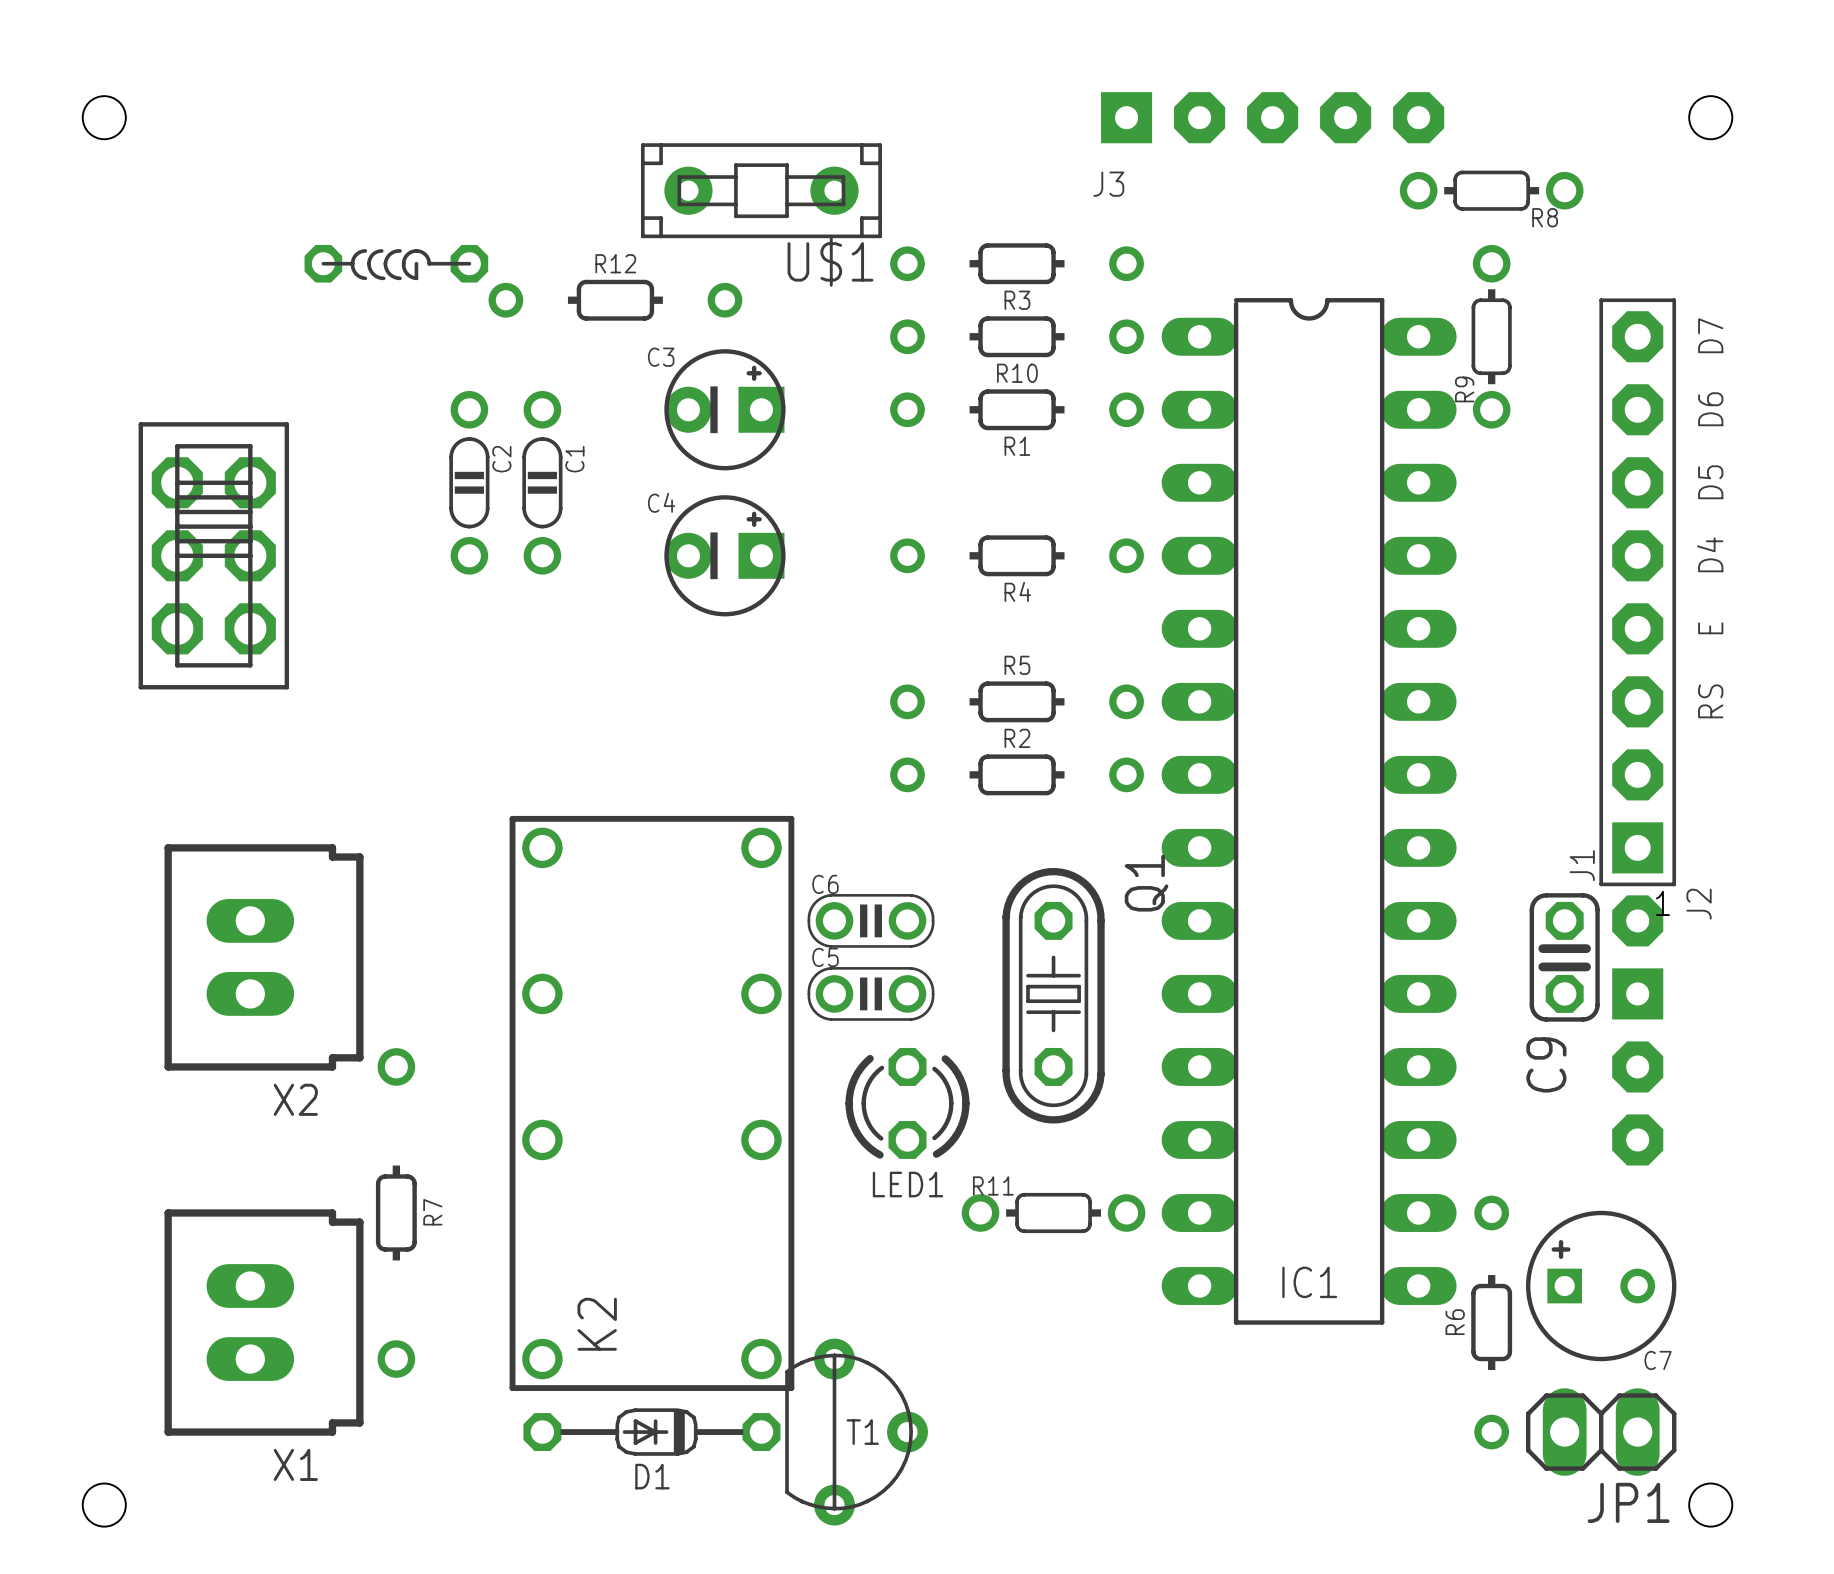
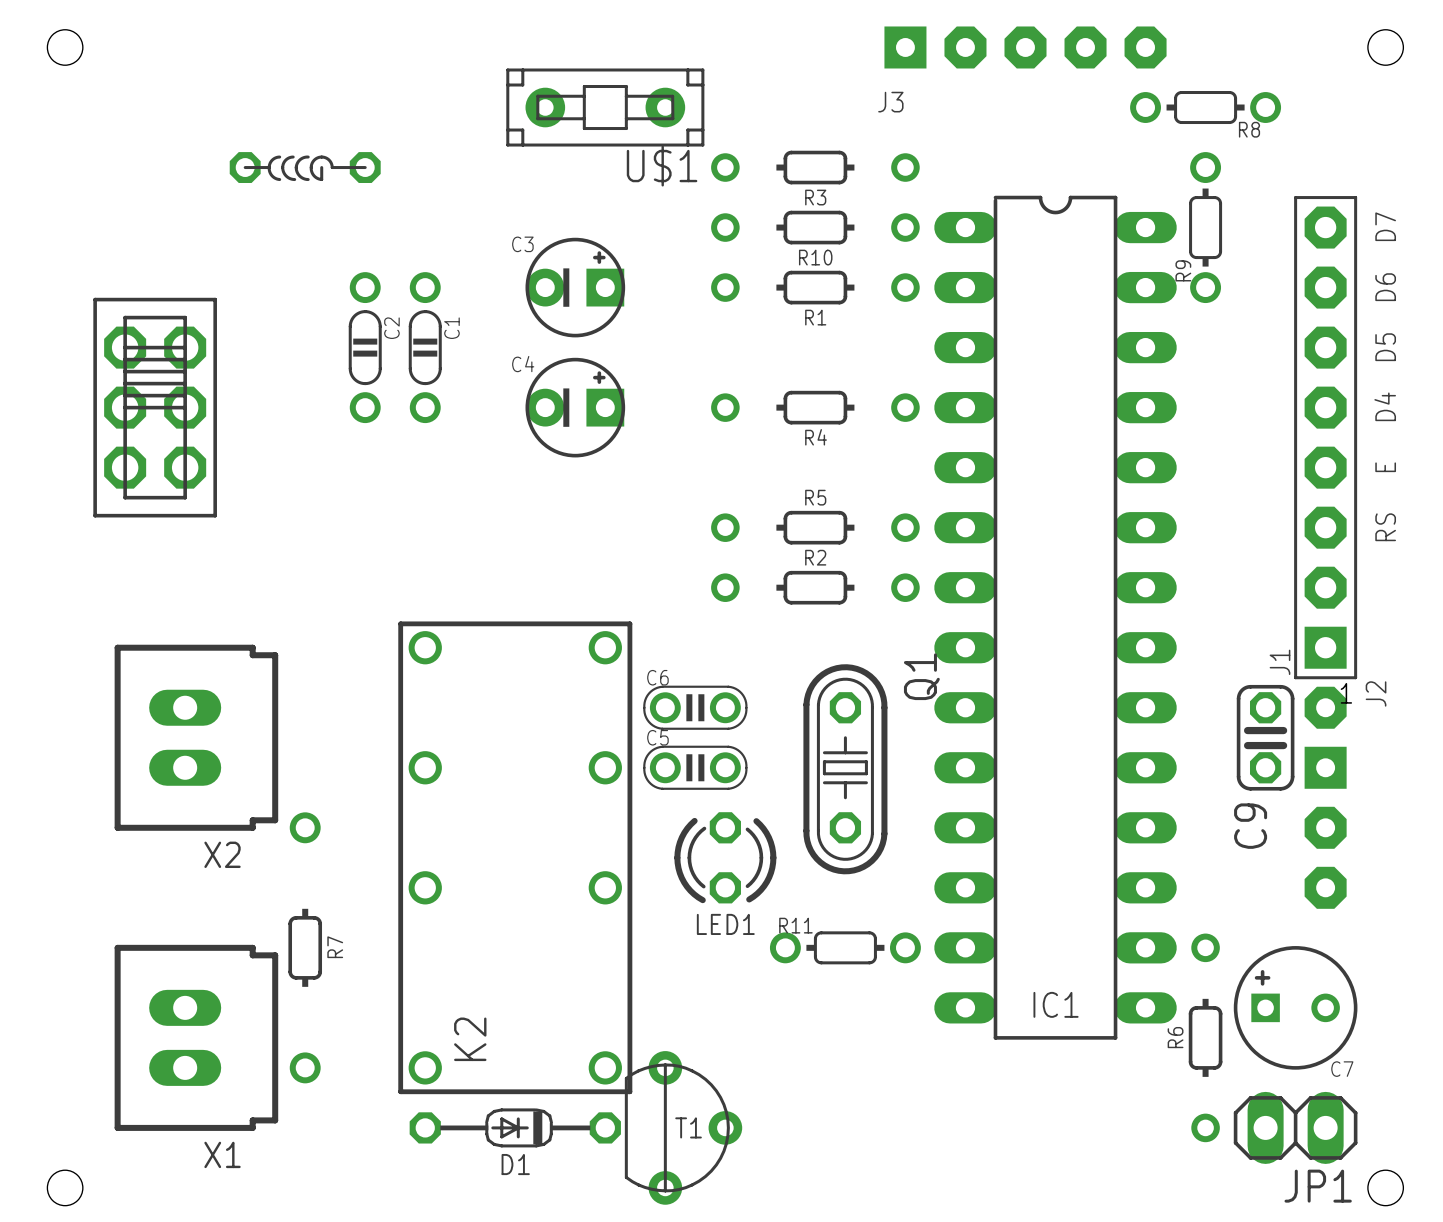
R12: (615, 300) -> none

